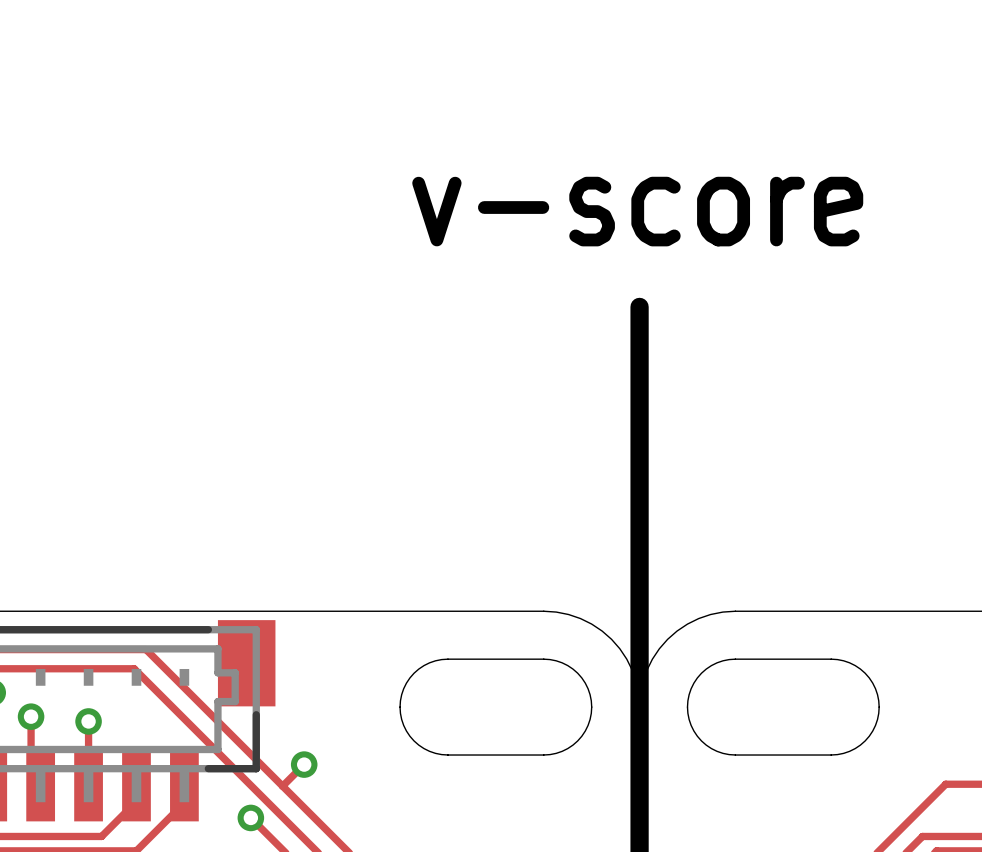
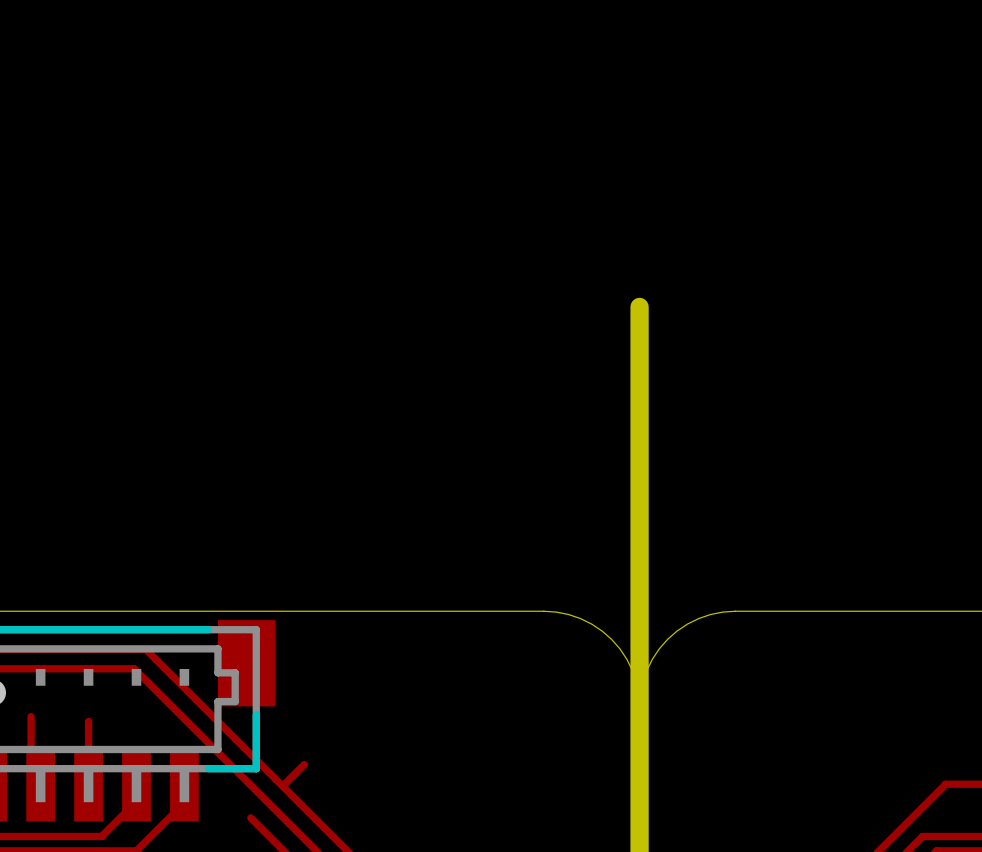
text: v-score (637, 211) -> none
board edge: (447, 659) (543, 659) (556, 660) (567, 665) (581, 677) (590, 694) (591, 713) (585, 731) (572, 745) (562, 751) (550, 754) (447, 755) (435, 753) (424, 748) (414, 740) (403, 725) (400, 707) (401, 694) (406, 683) (418, 669) (429, 662) (447, 659) -> none
board edge: (735, 659) (831, 659) (843, 660) (855, 665) (869, 677) (877, 694) (878, 713) (872, 731) (860, 745) (849, 751) (837, 754) (735, 755) (723, 753) (711, 748) (697, 736) (691, 725) (687, 707) (689, 694) (697, 677) (706, 669) (717, 662) (735, 659) -> none
via: (31, 716) -> none
via: (88, 721) -> none
via: (304, 764) -> none
via: (250, 817) -> none

